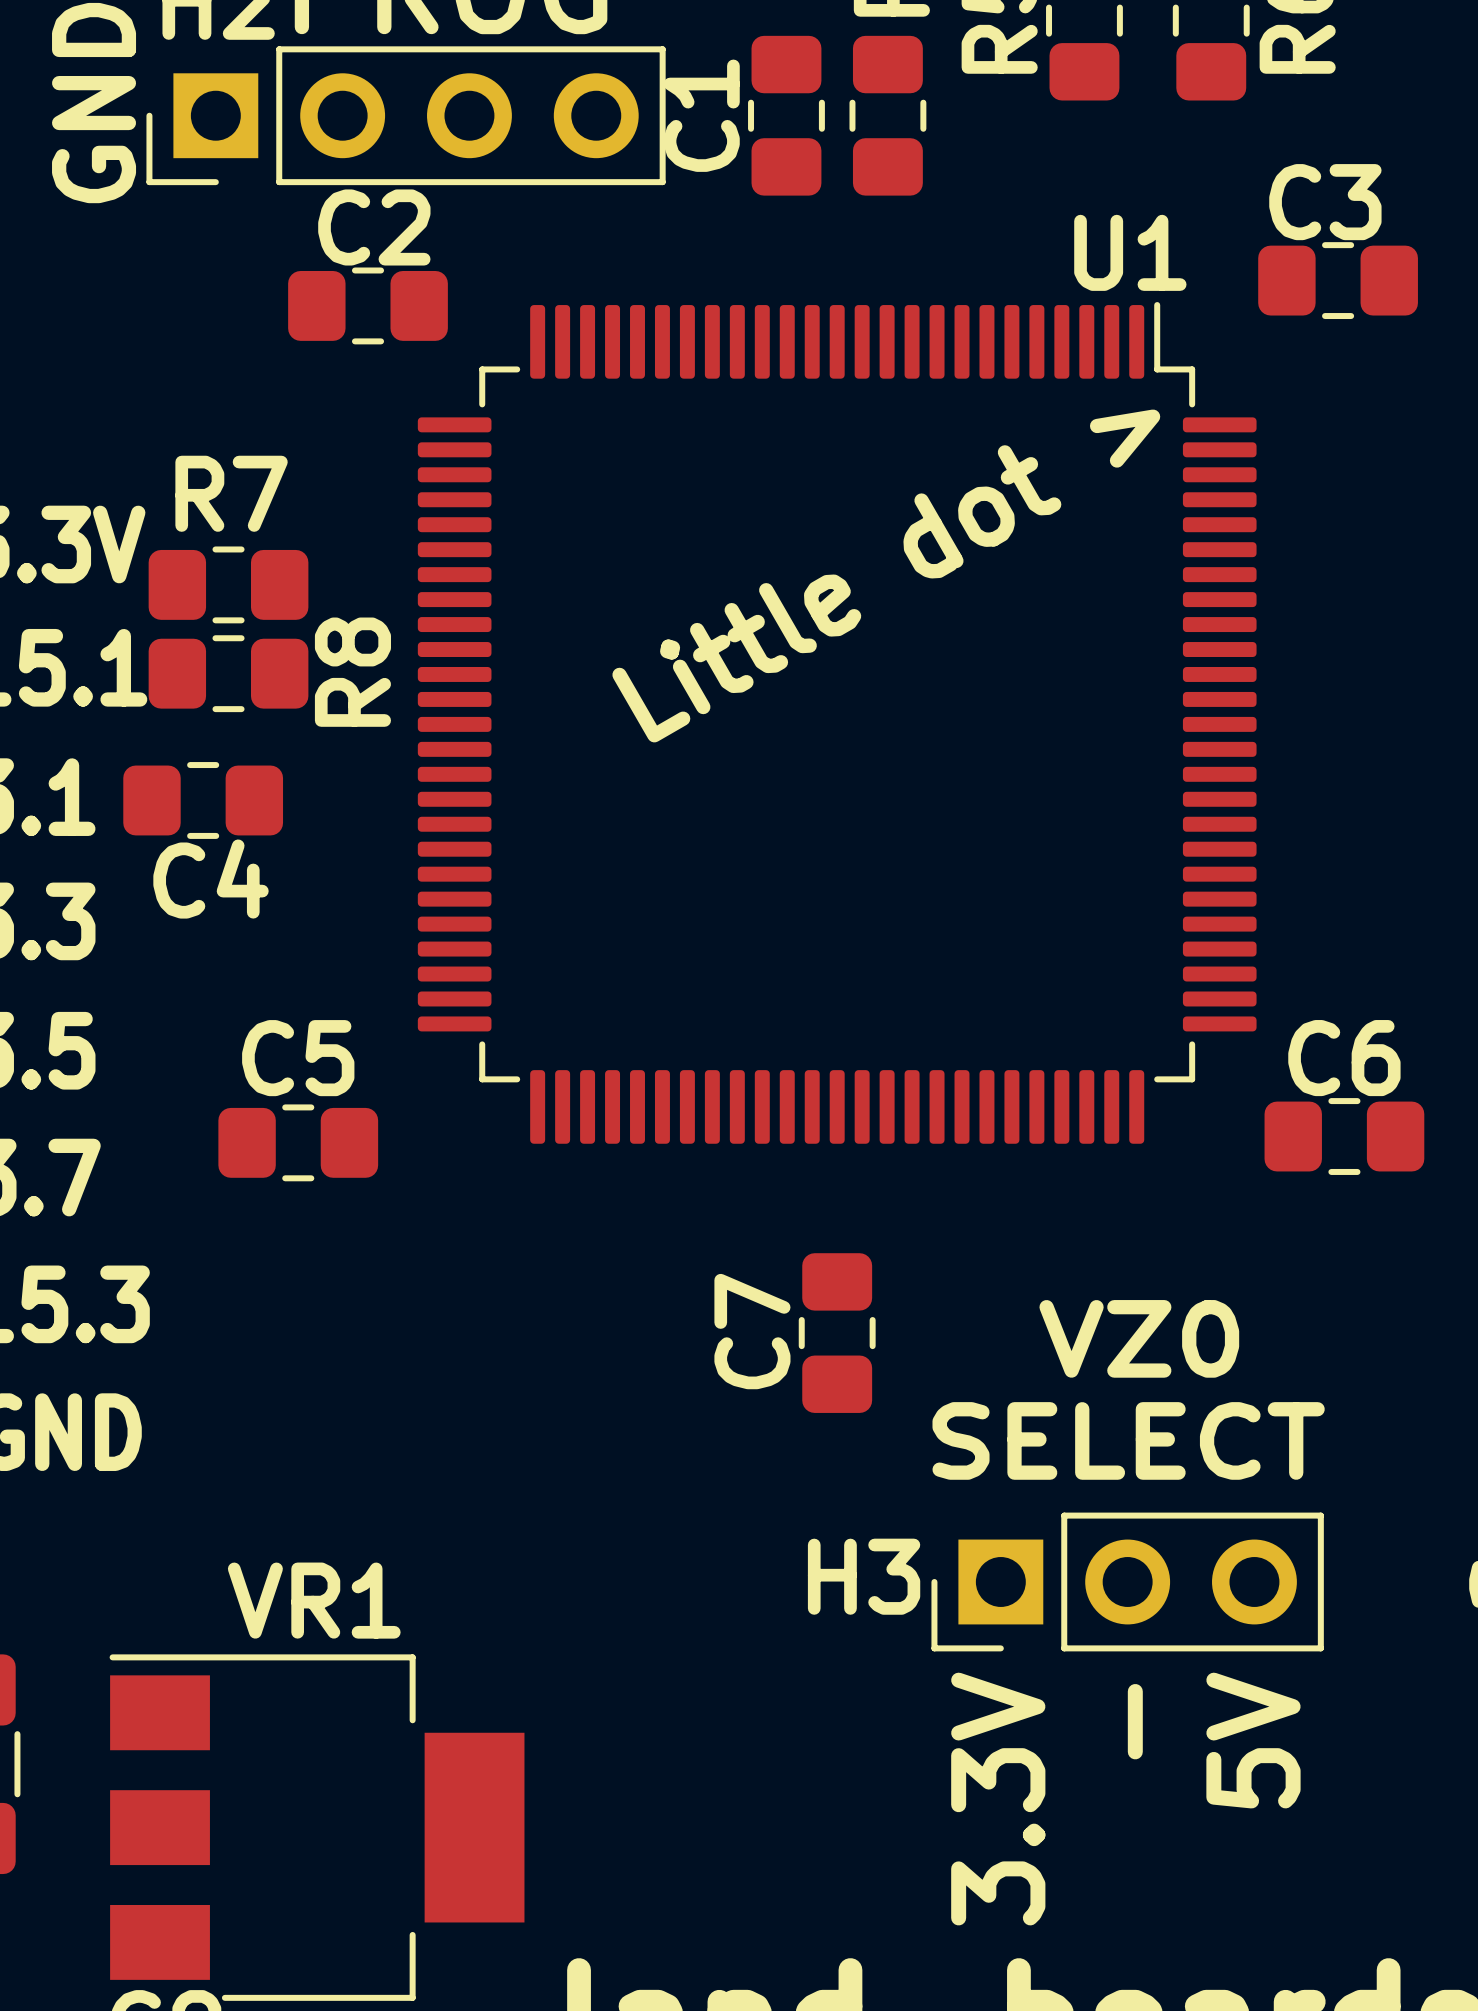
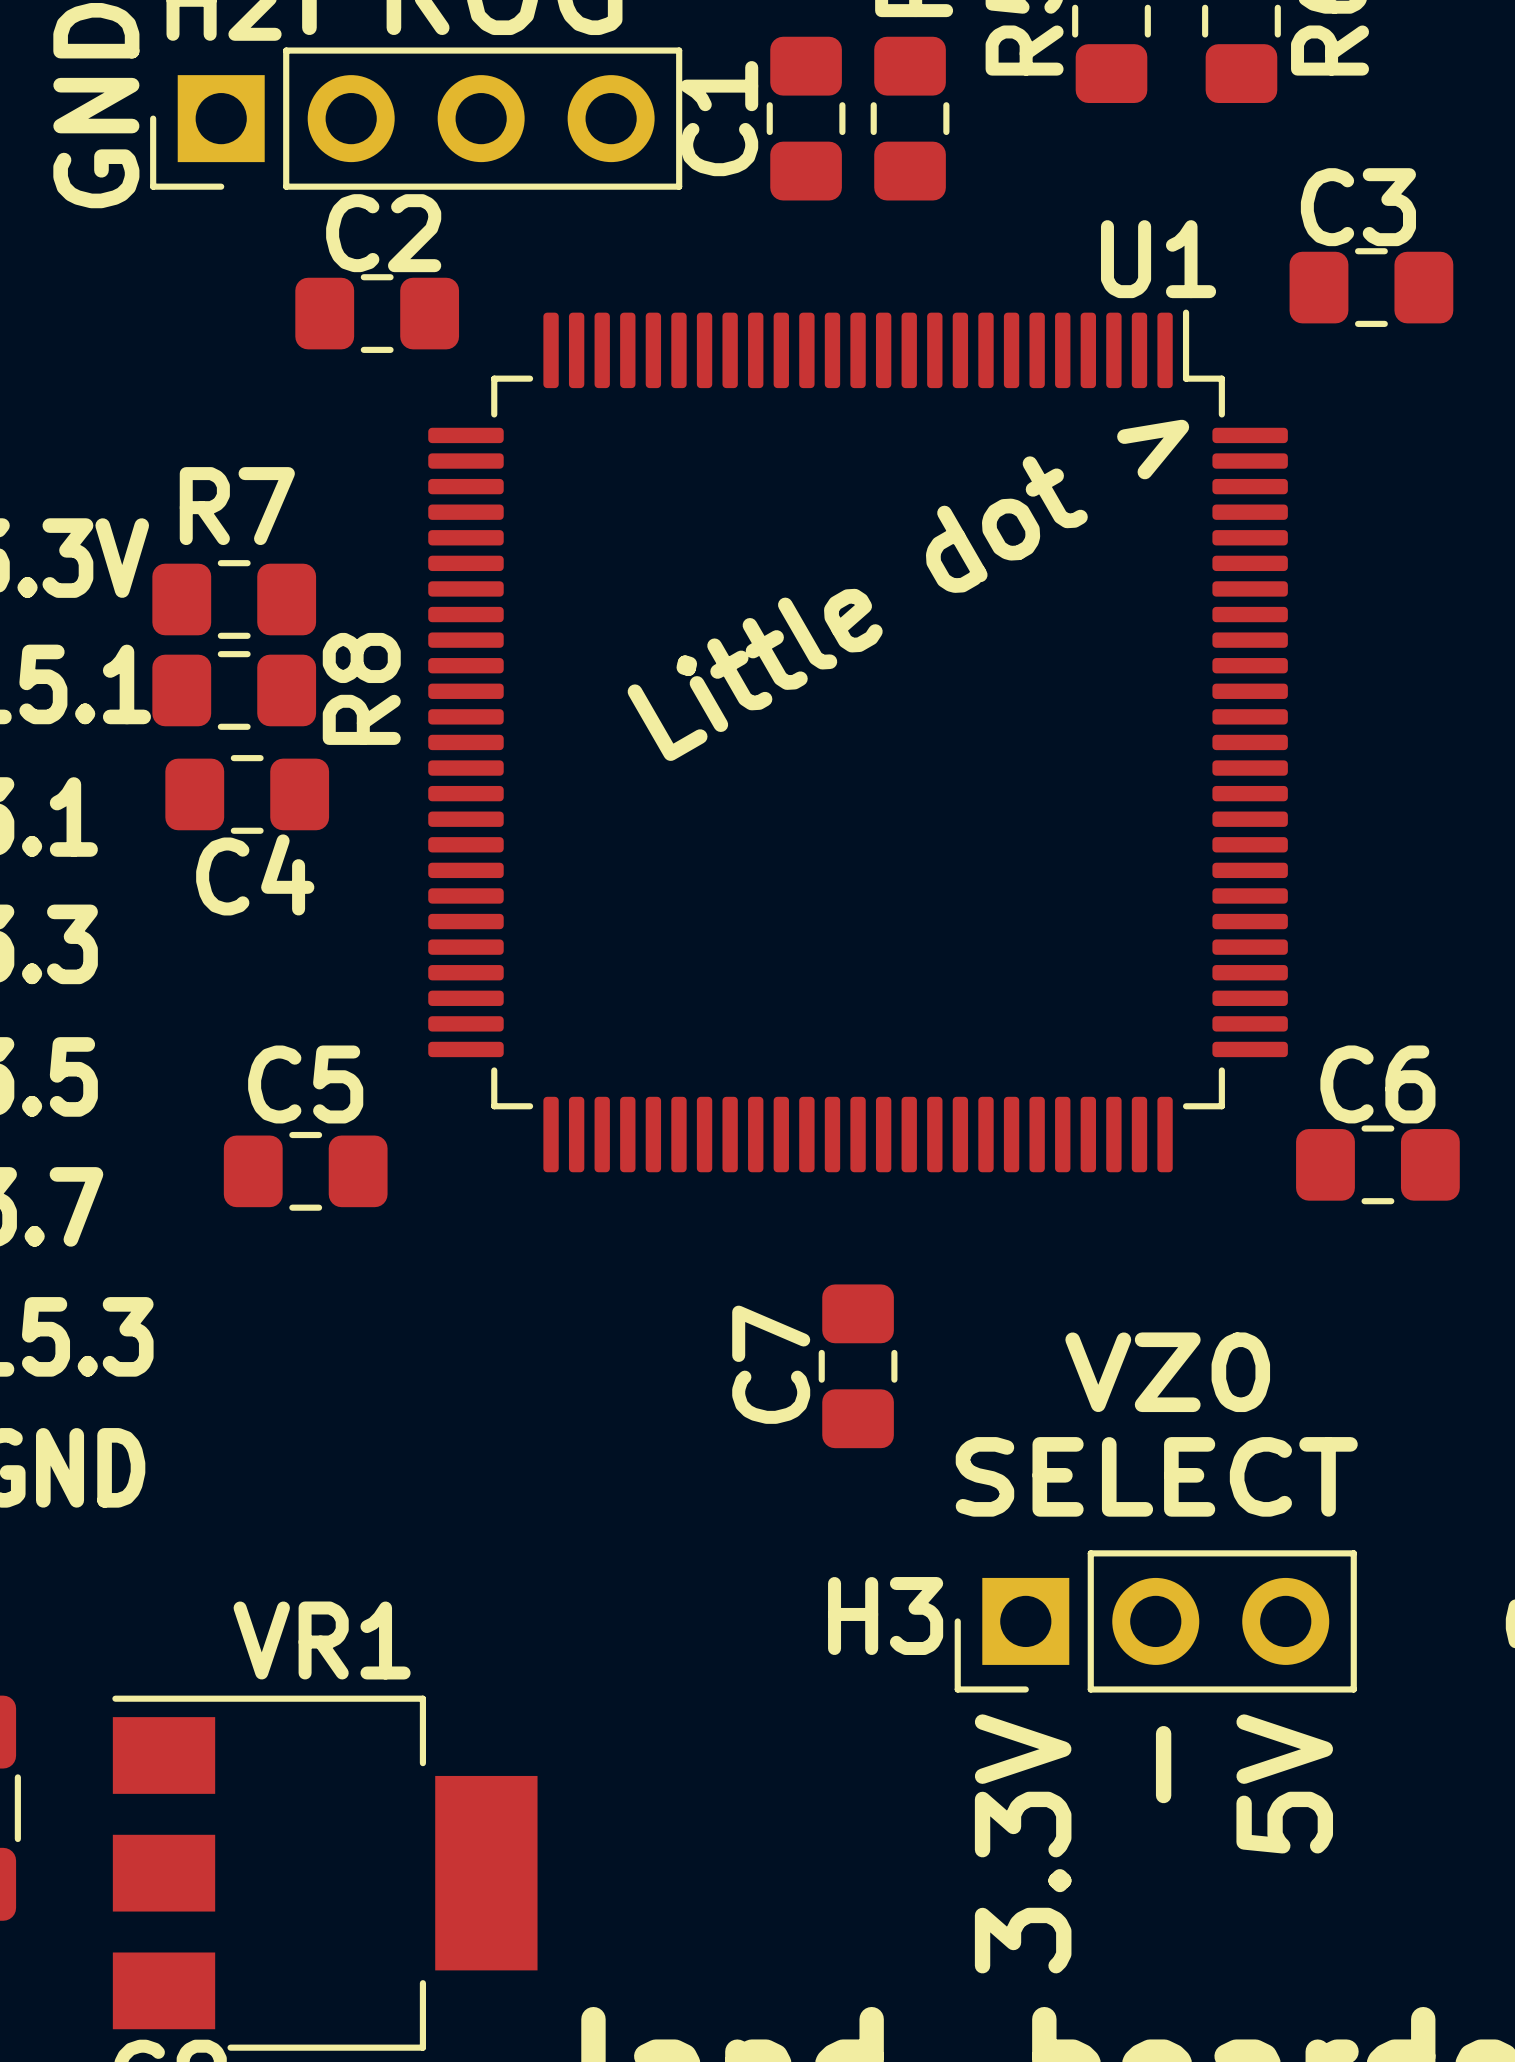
C4 position: (203, 800) -> (247, 794)

